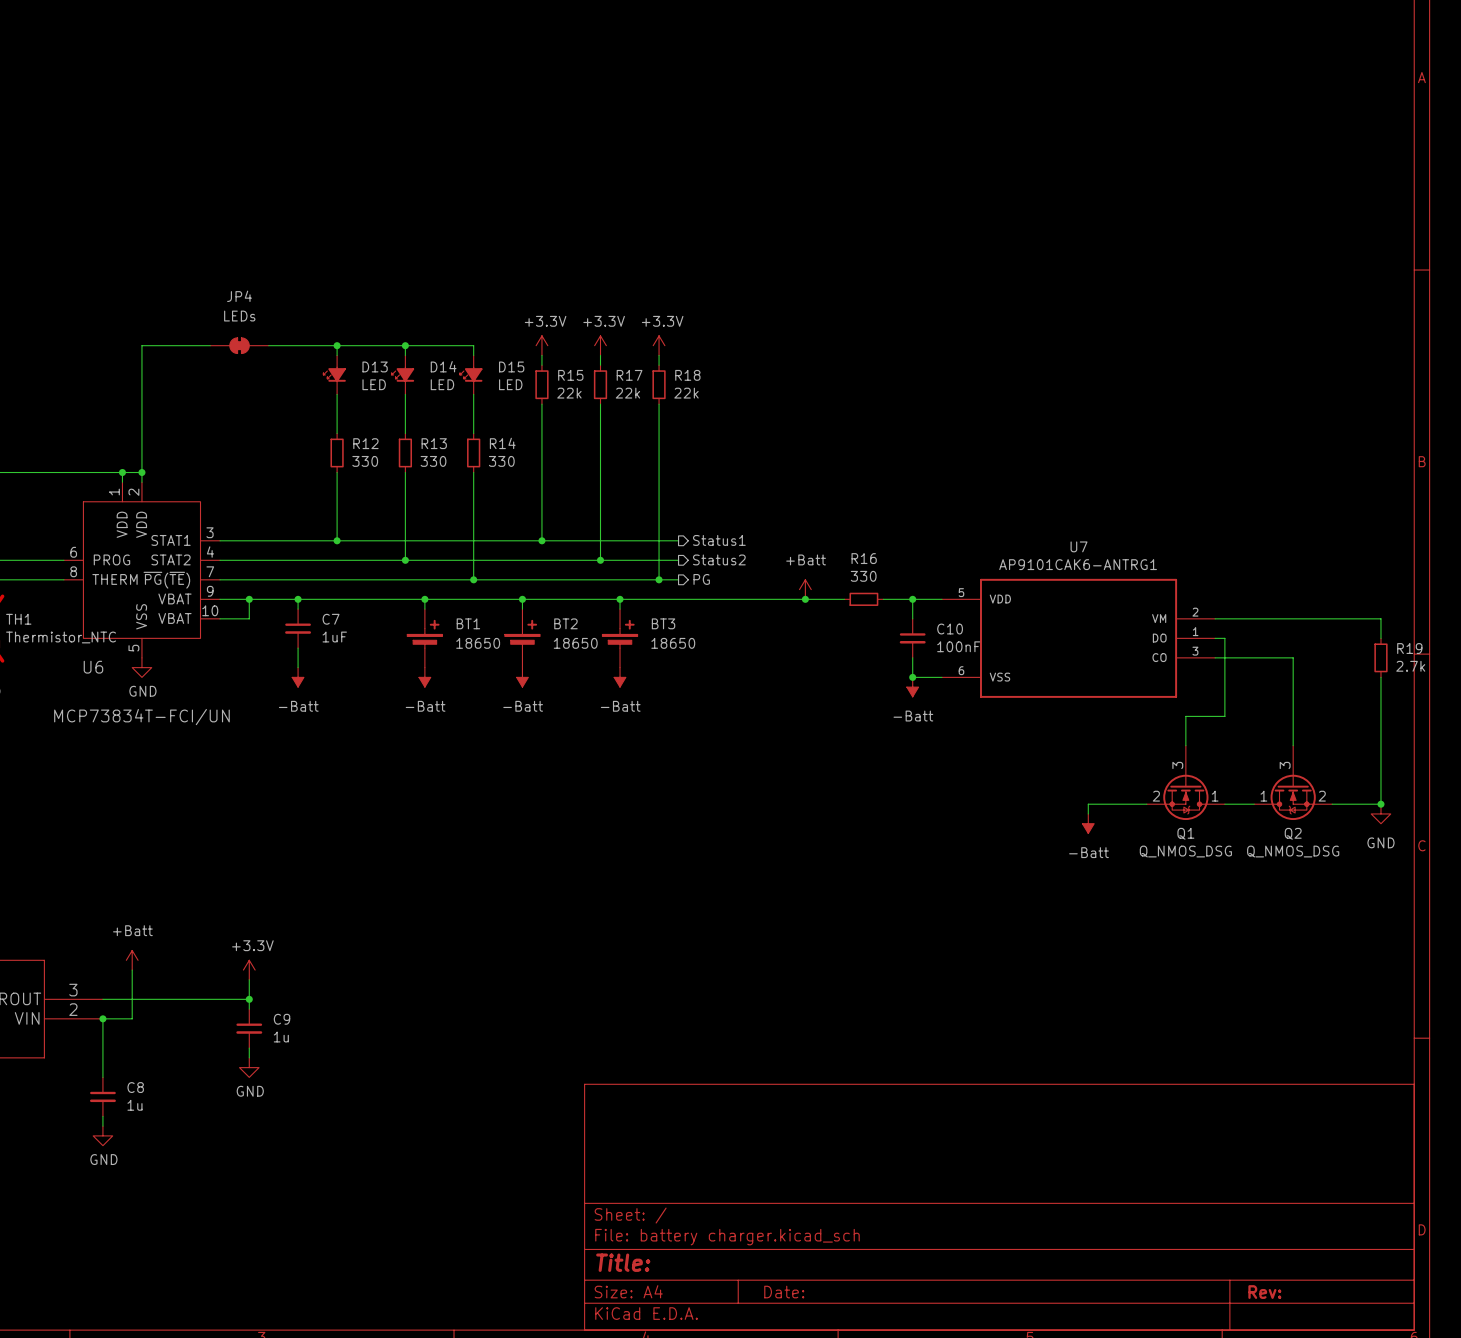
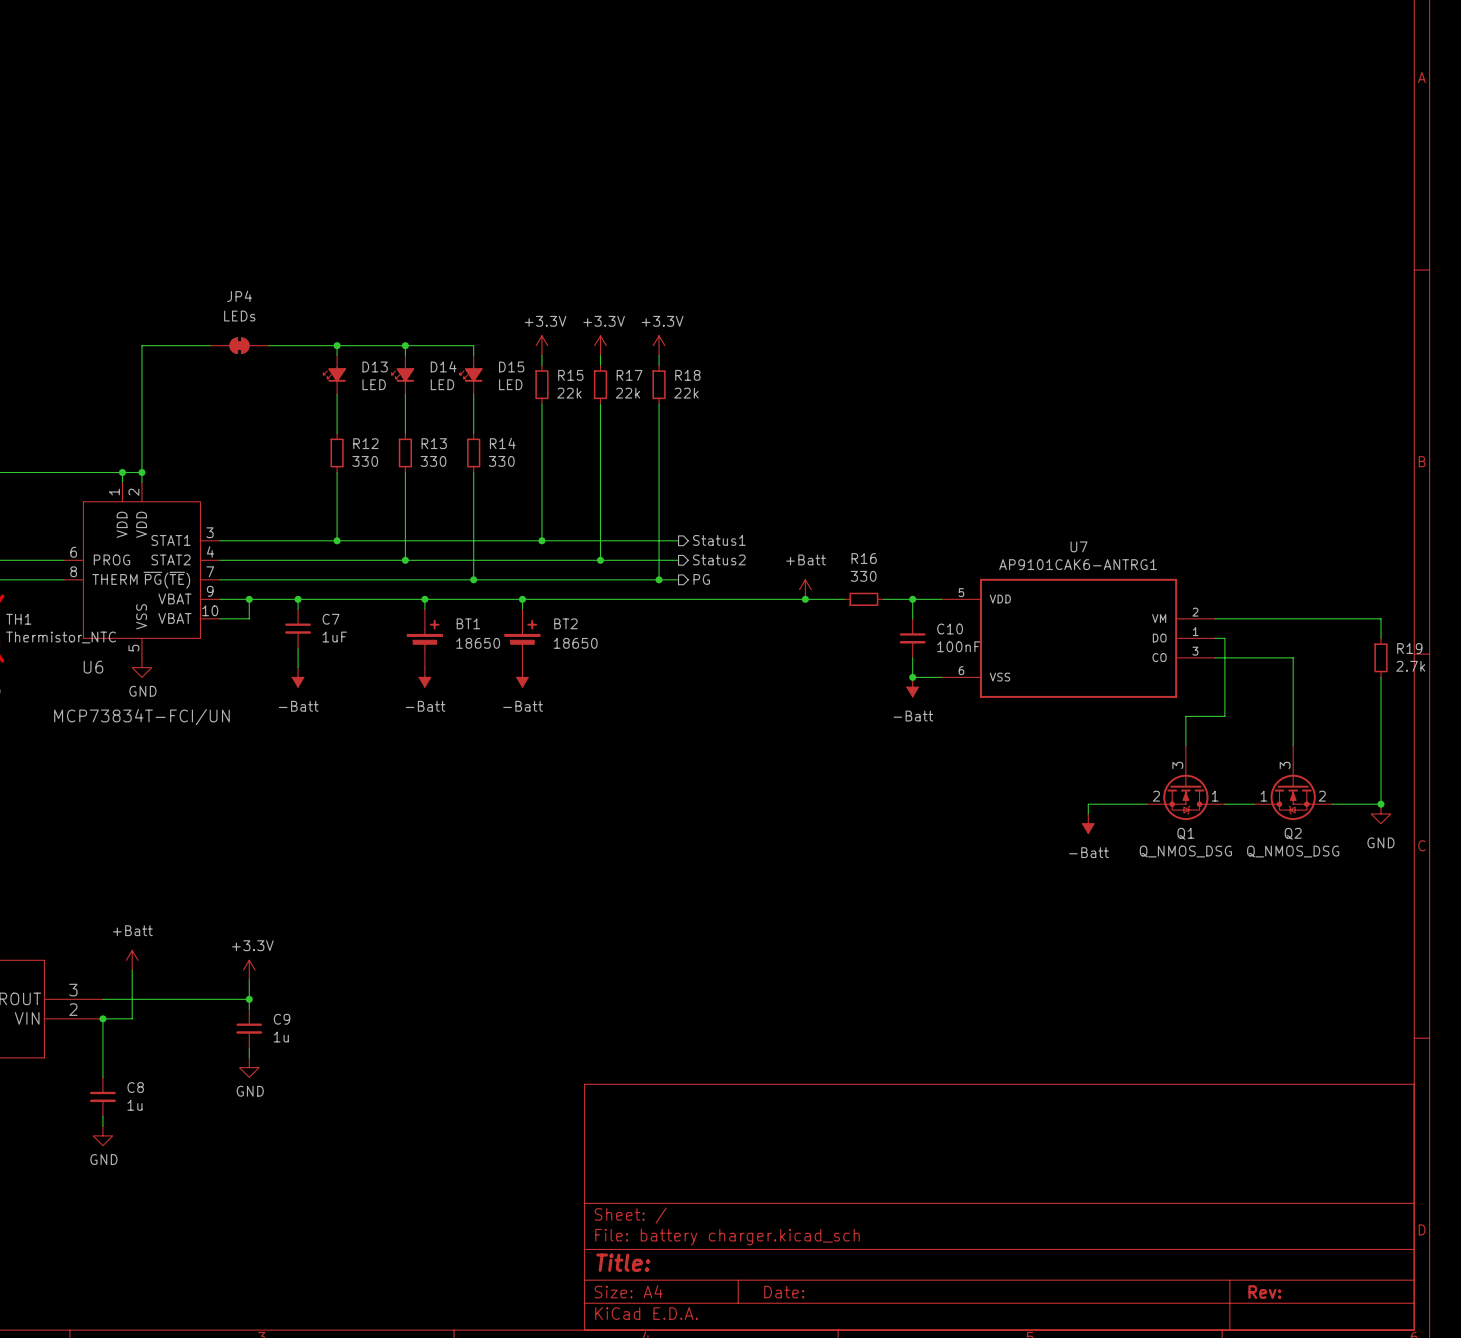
wire: (620, 599) (620, 609) -> none
junction: (620, 599) -> none
BT3: 18650 (620, 638) -> none
power symbol: -Batt (620, 677) -> none

